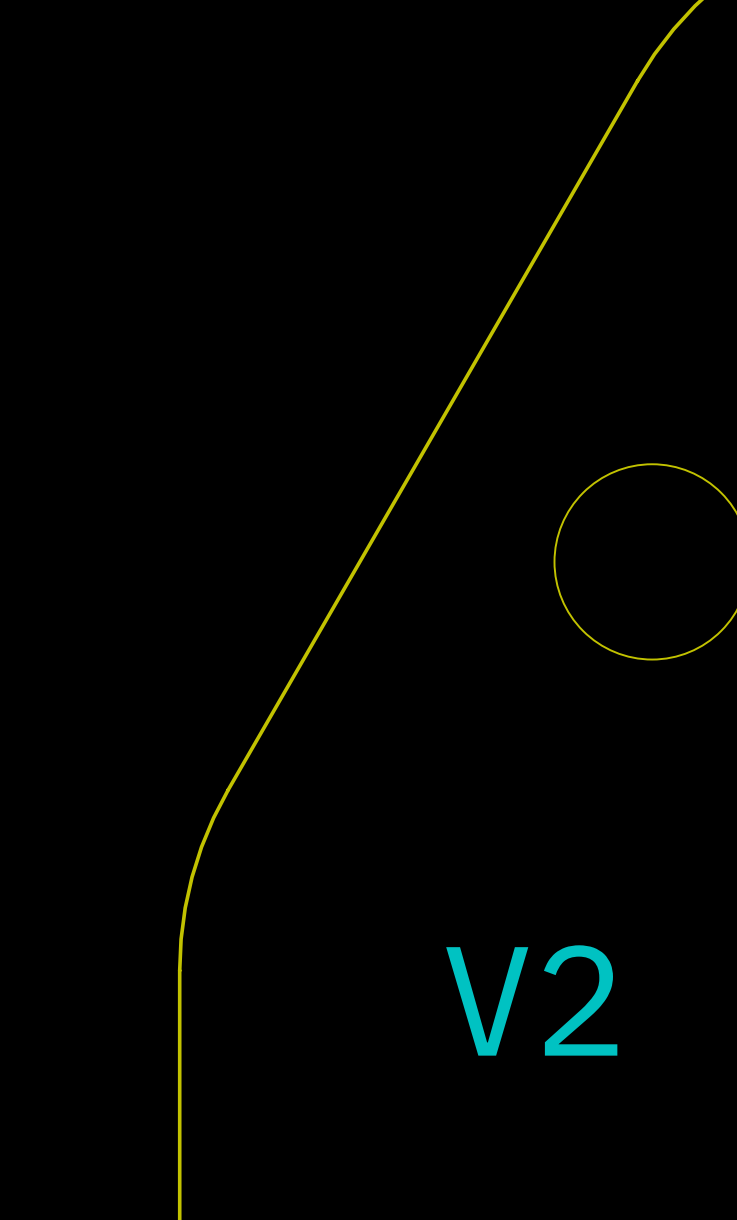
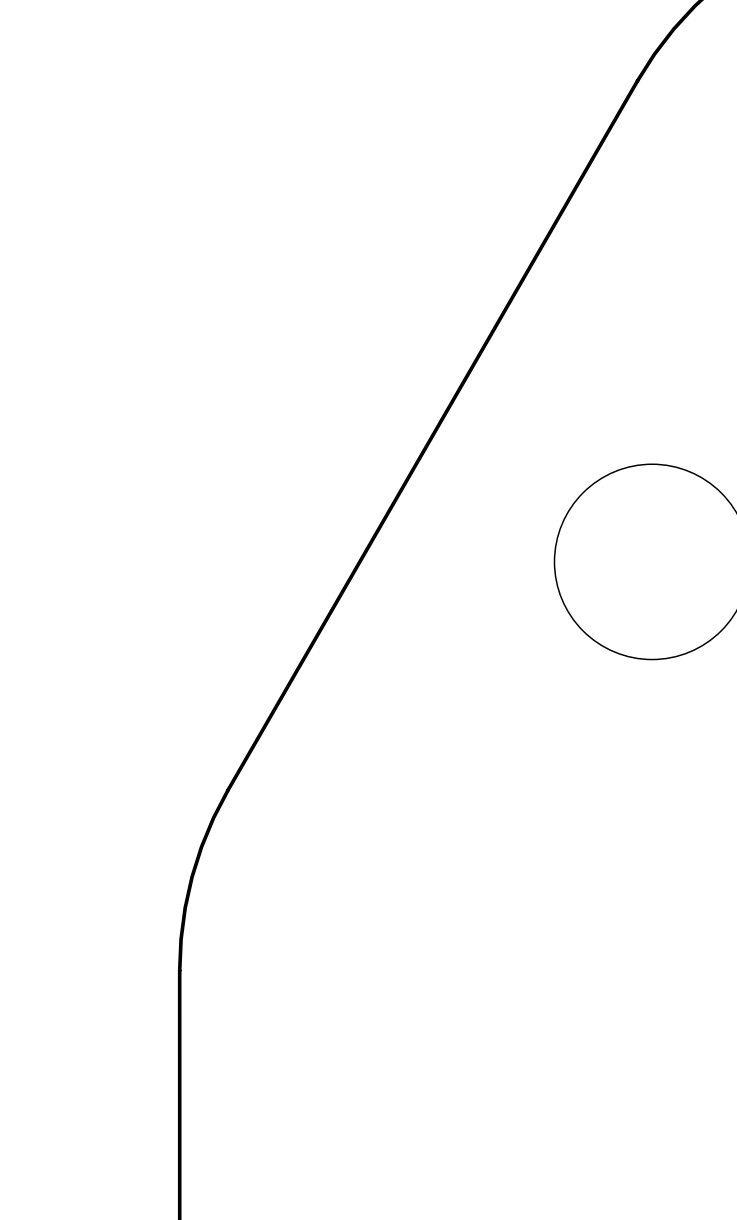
text: V2 (531, 1000) -> none

